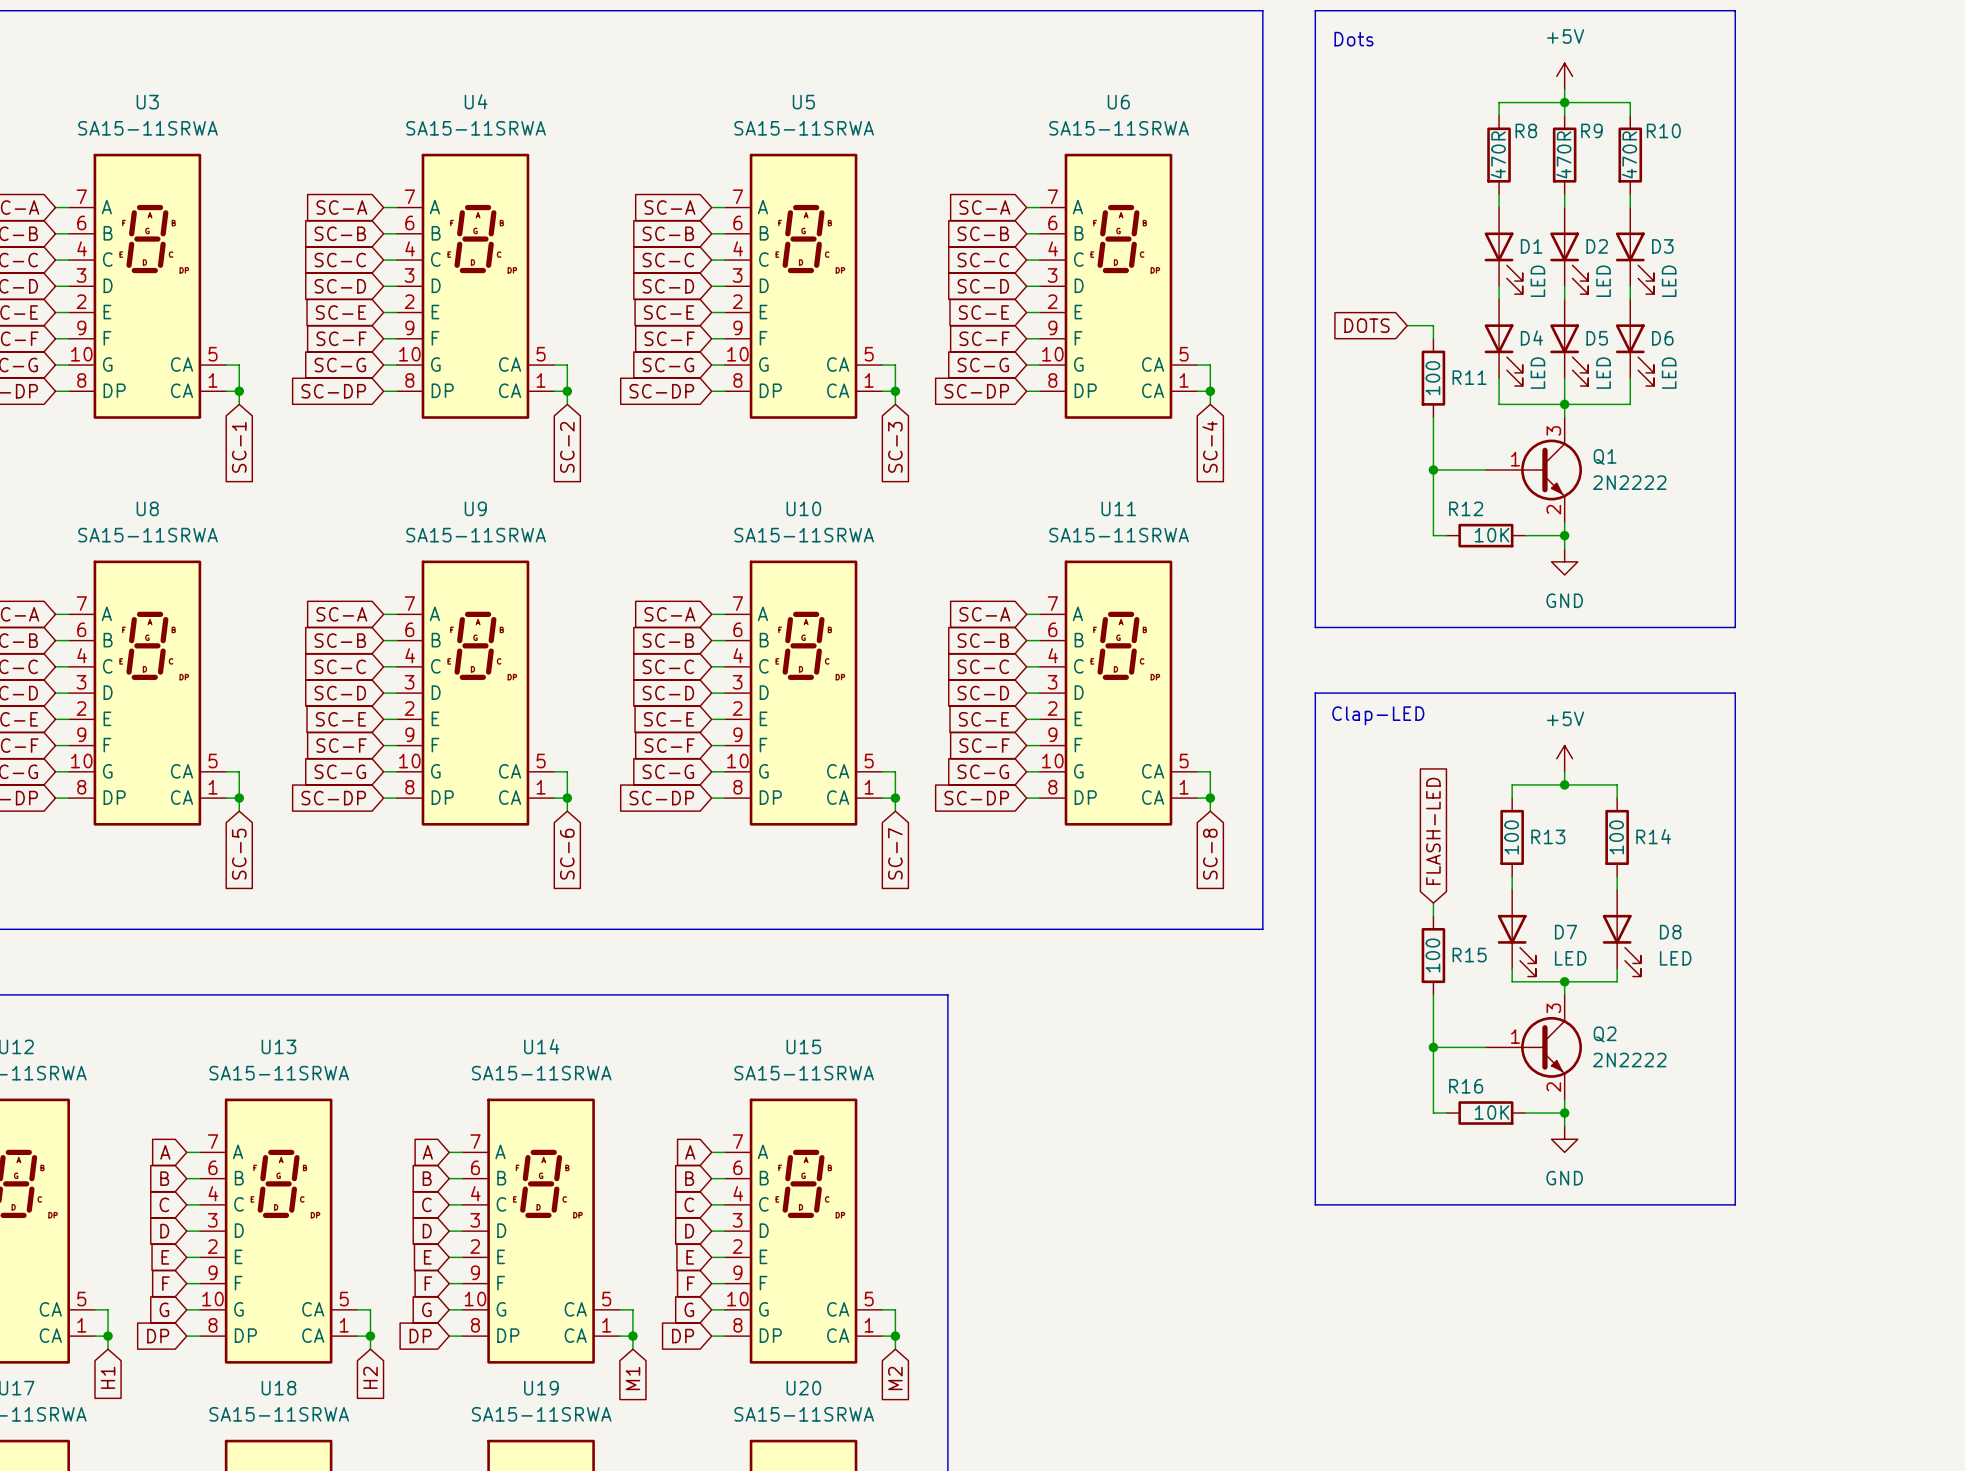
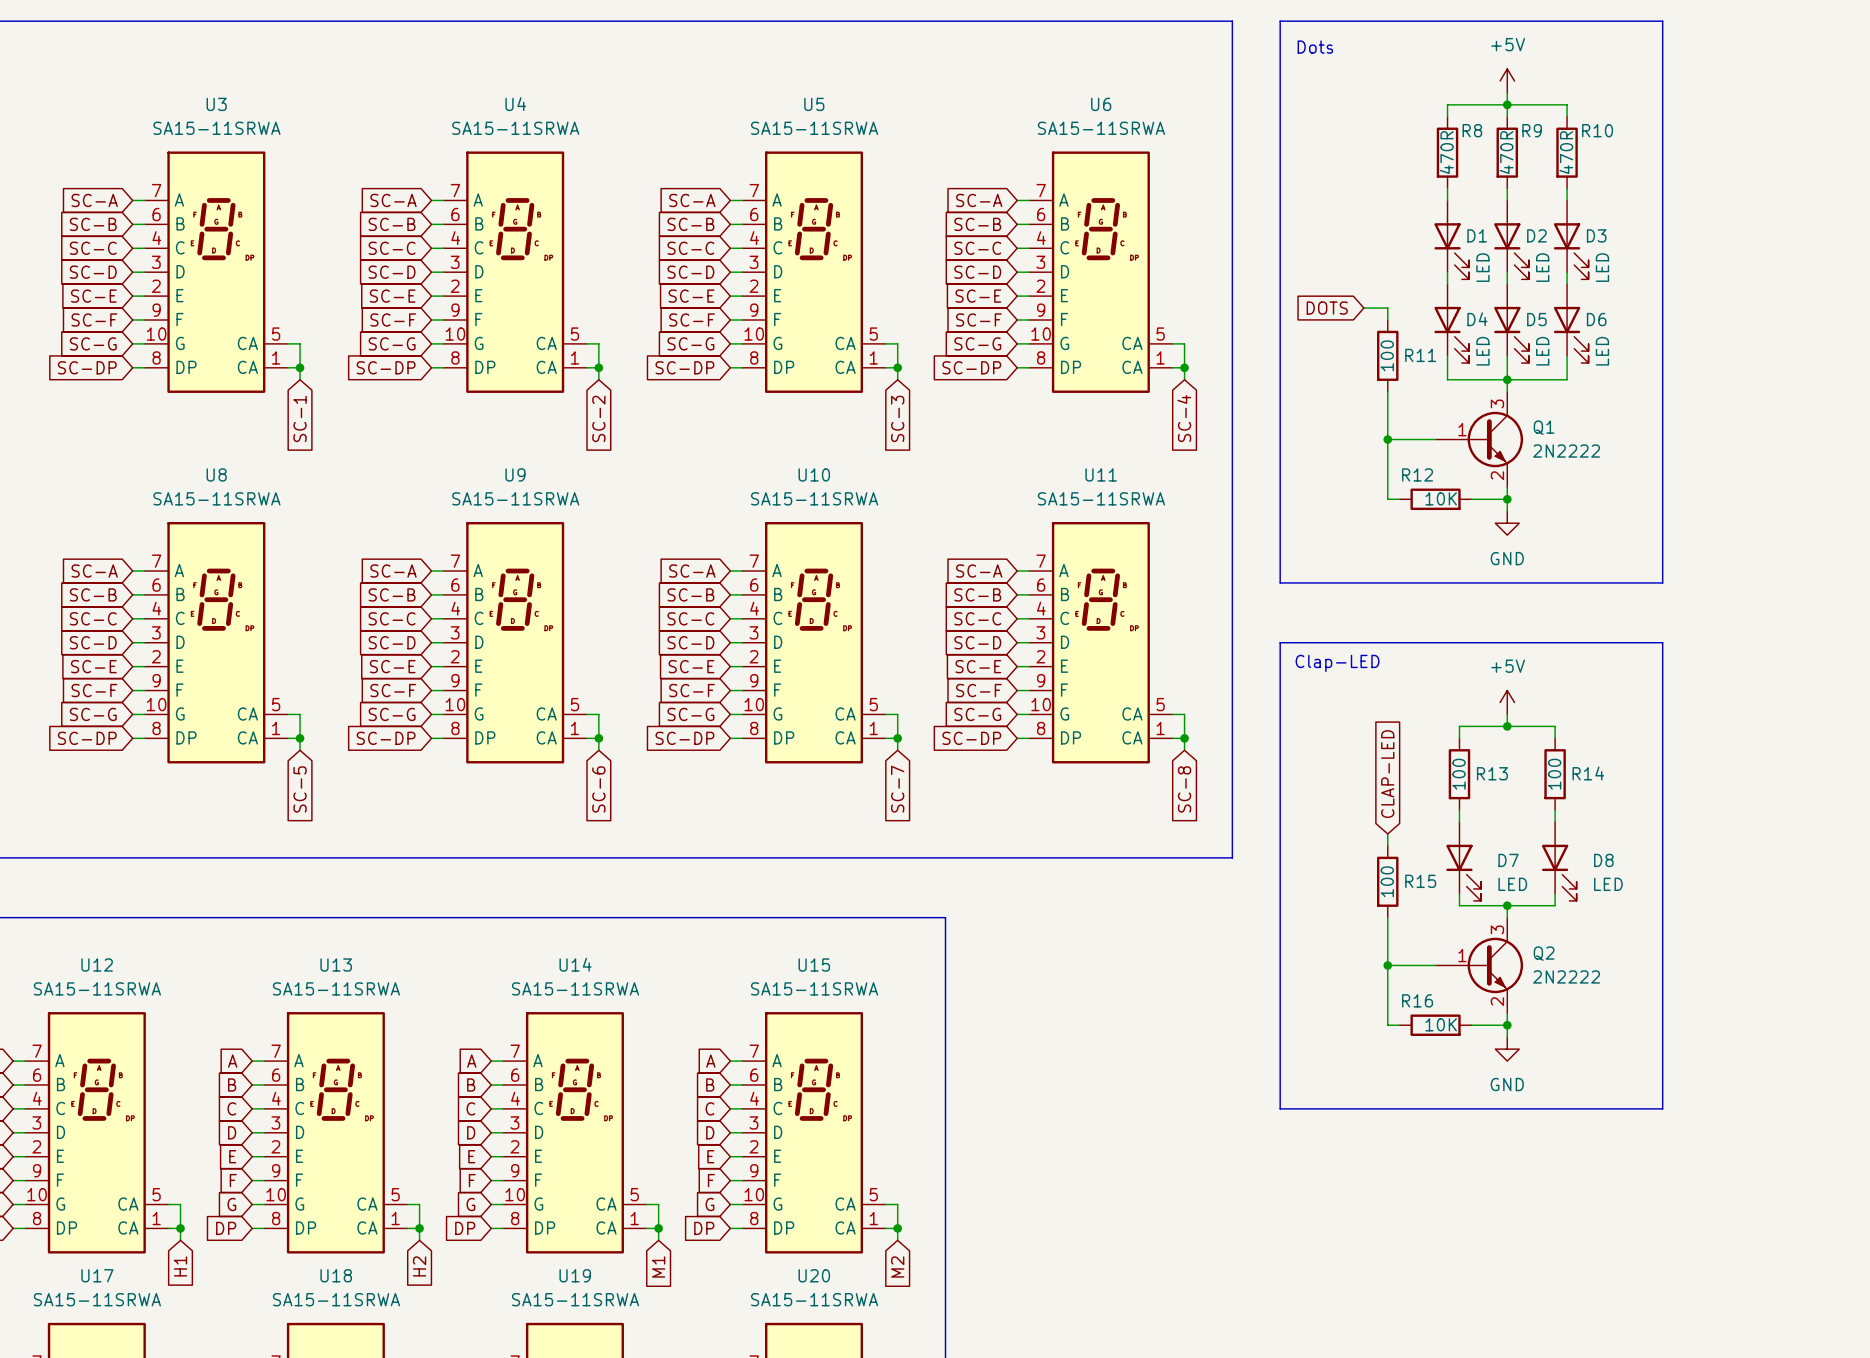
global label: FLASH-LED (1433, 831) -> CLAP-LED (1387, 774)

